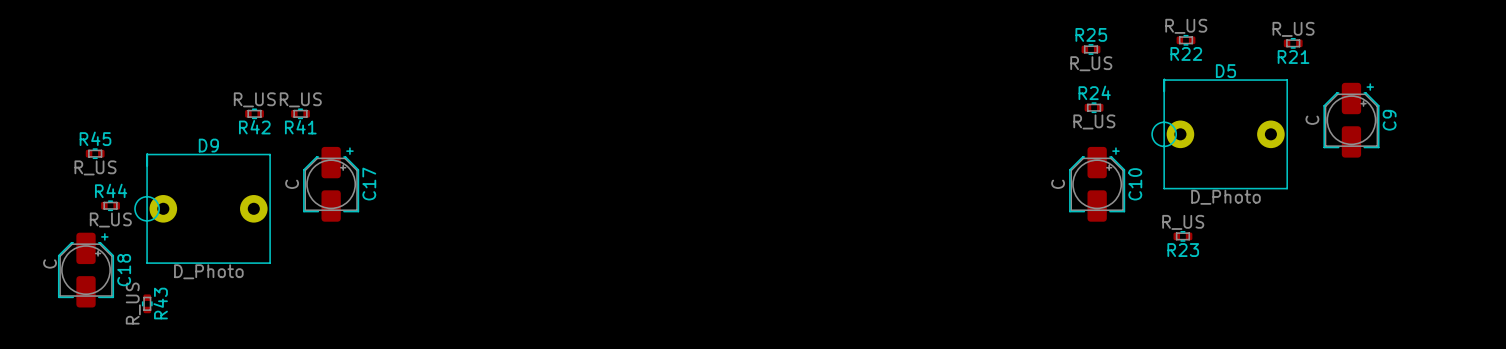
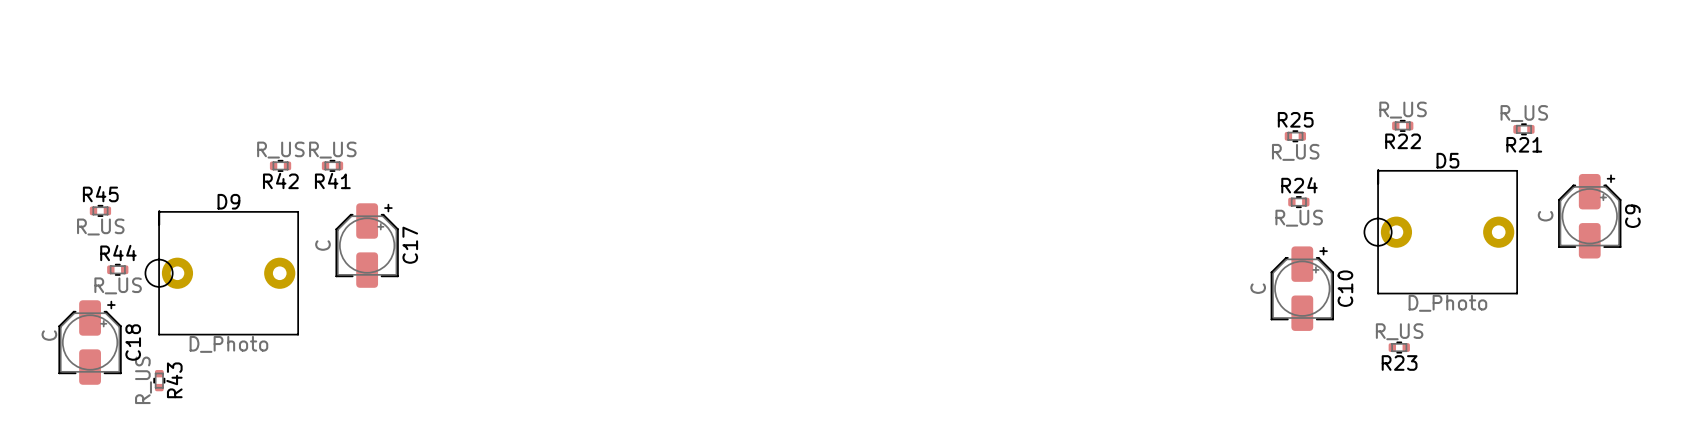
R22 position: (1186, 40) -> (1402, 125)
R21 position: (1293, 43) -> (1523, 129)
R25 position: (1091, 49) -> (1295, 136)
R24 position: (1094, 107) -> (1298, 202)
C9 position: (1351, 120) -> (1589, 216)
D5 position: (1219, 133) -> (1440, 231)
C10 position: (1097, 184) -> (1302, 288)
R23 position: (1182, 236) -> (1399, 347)

